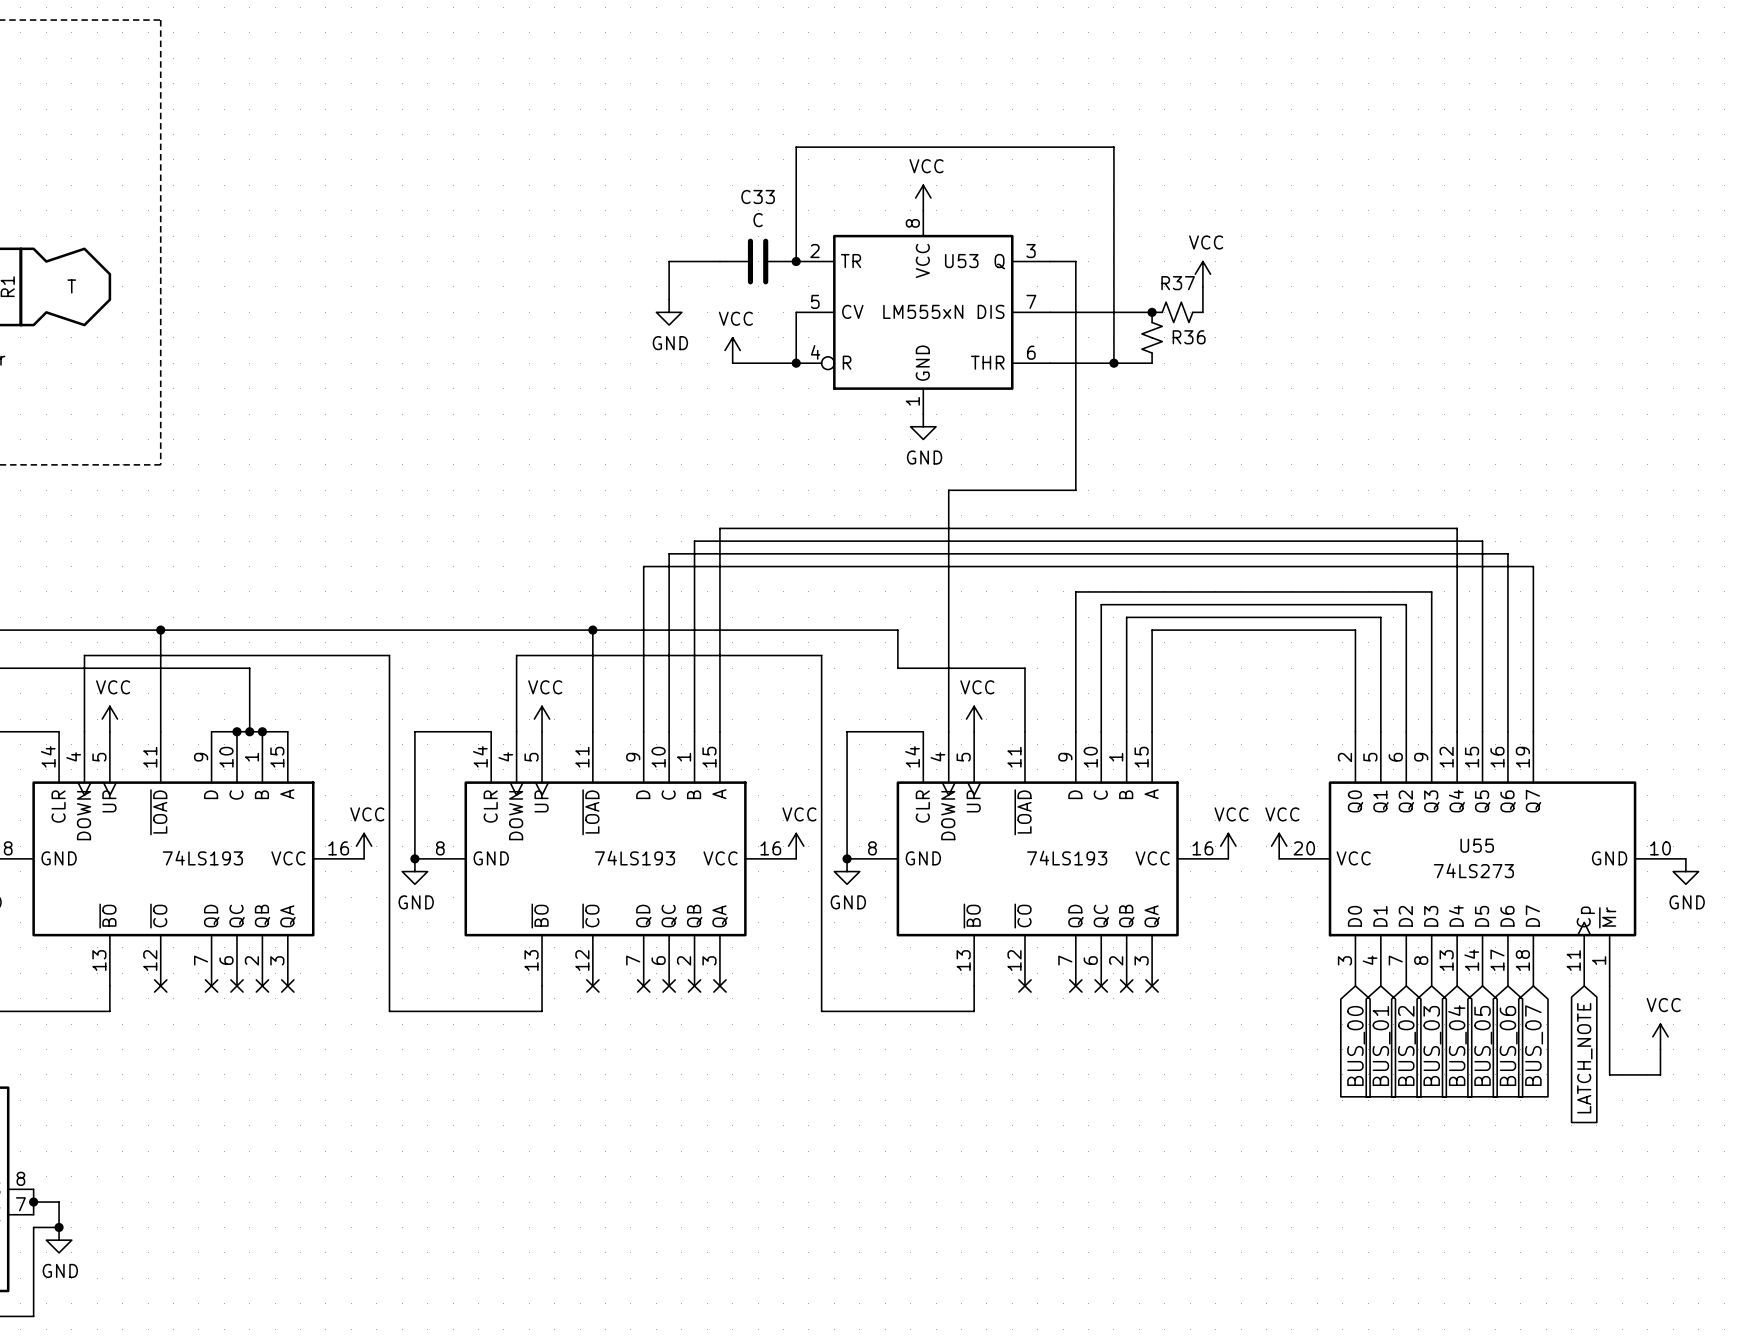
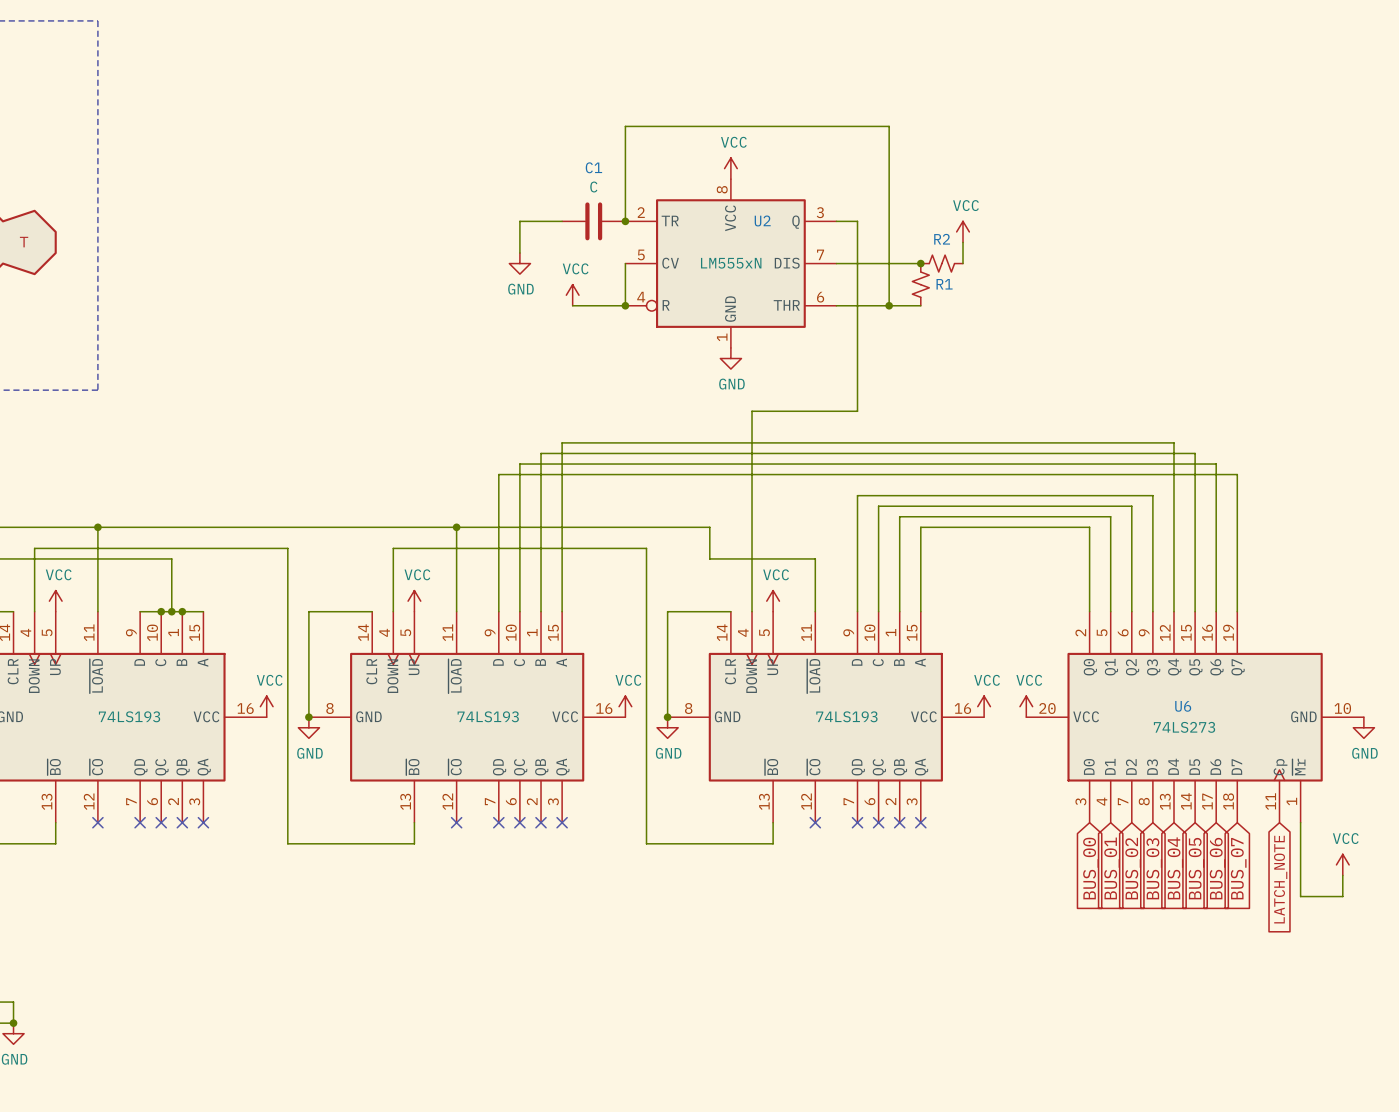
C33 name: C33 (758, 196) -> C1 (593, 167)
U53 name: U53 (961, 261) -> U2 (762, 220)
R37 name: R37 (1178, 283) -> R2 (942, 239)
R36 name: R36 (1189, 337) -> R1 (944, 284)
U55 name: U55 (1477, 845) -> U6 (1183, 706)

